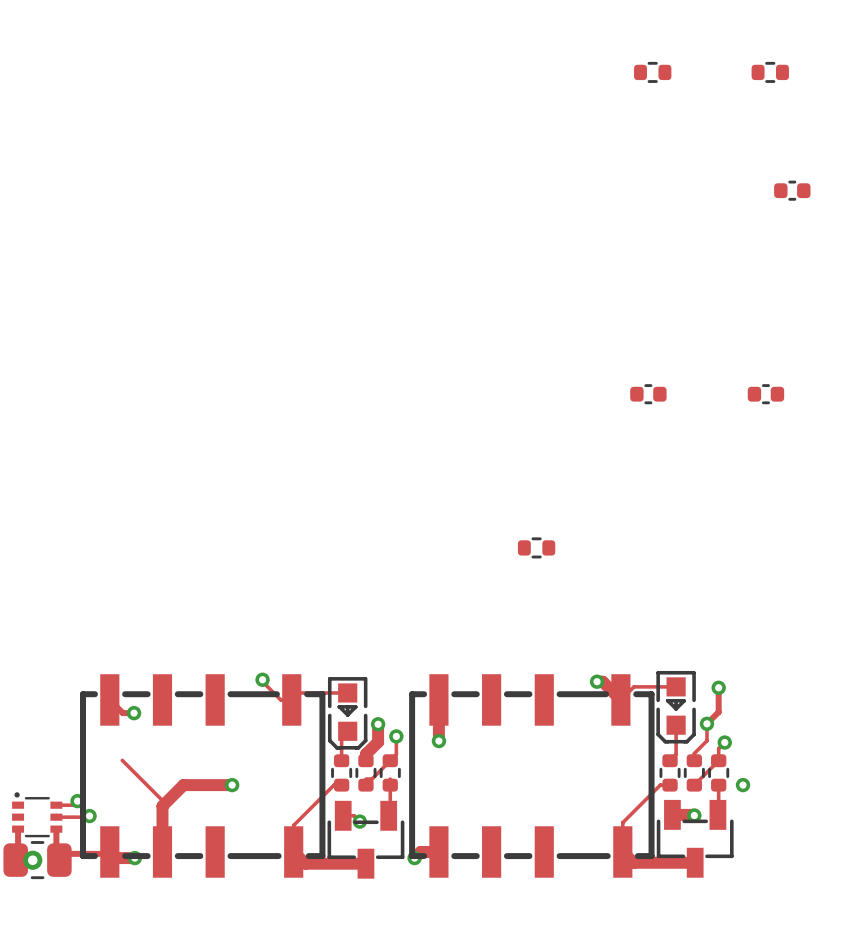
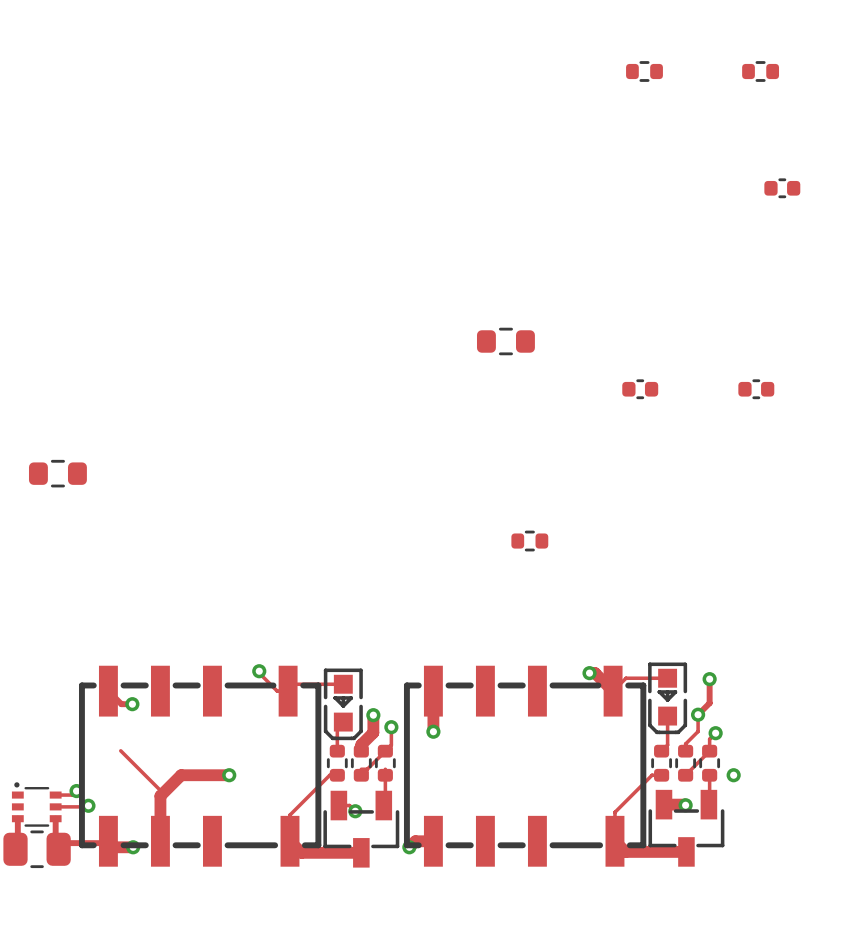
part: none -> (505, 341)
part: none -> (57, 473)
via: (32, 860) -> none

